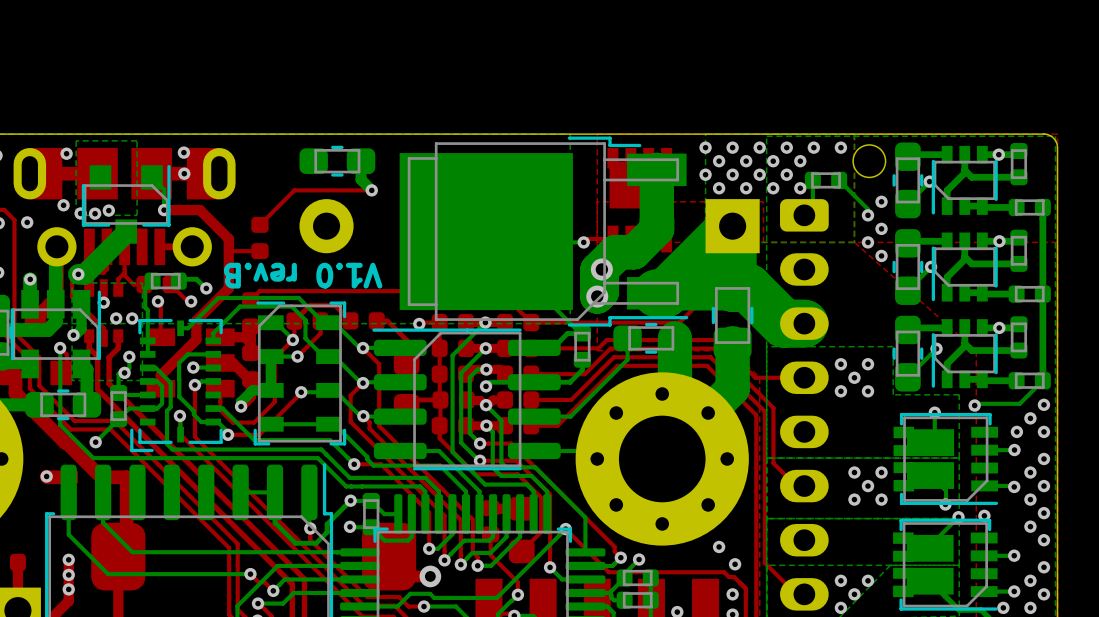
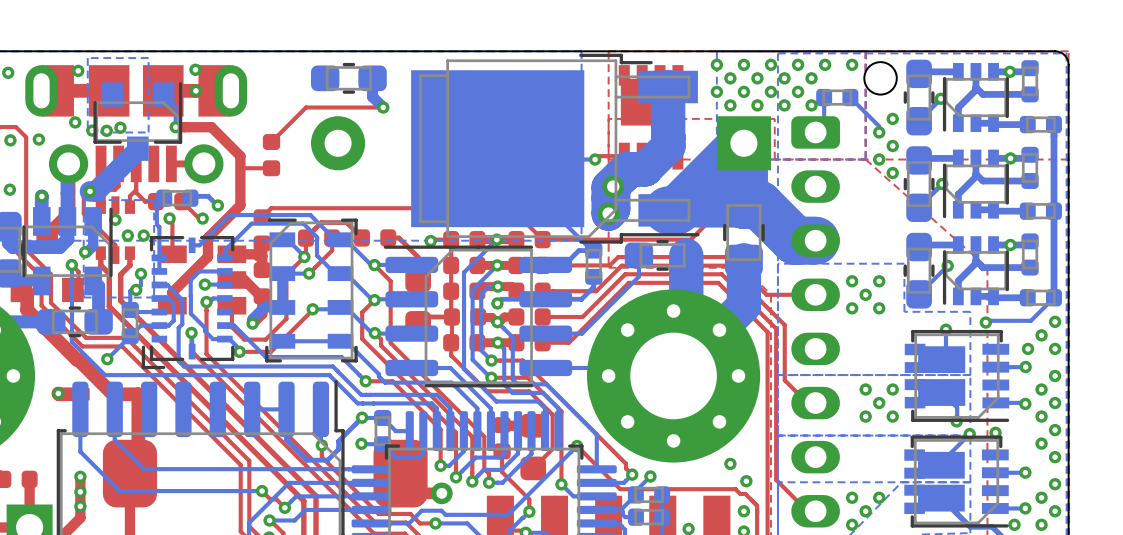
text: V1.0 rev.B (303, 275) -> none

